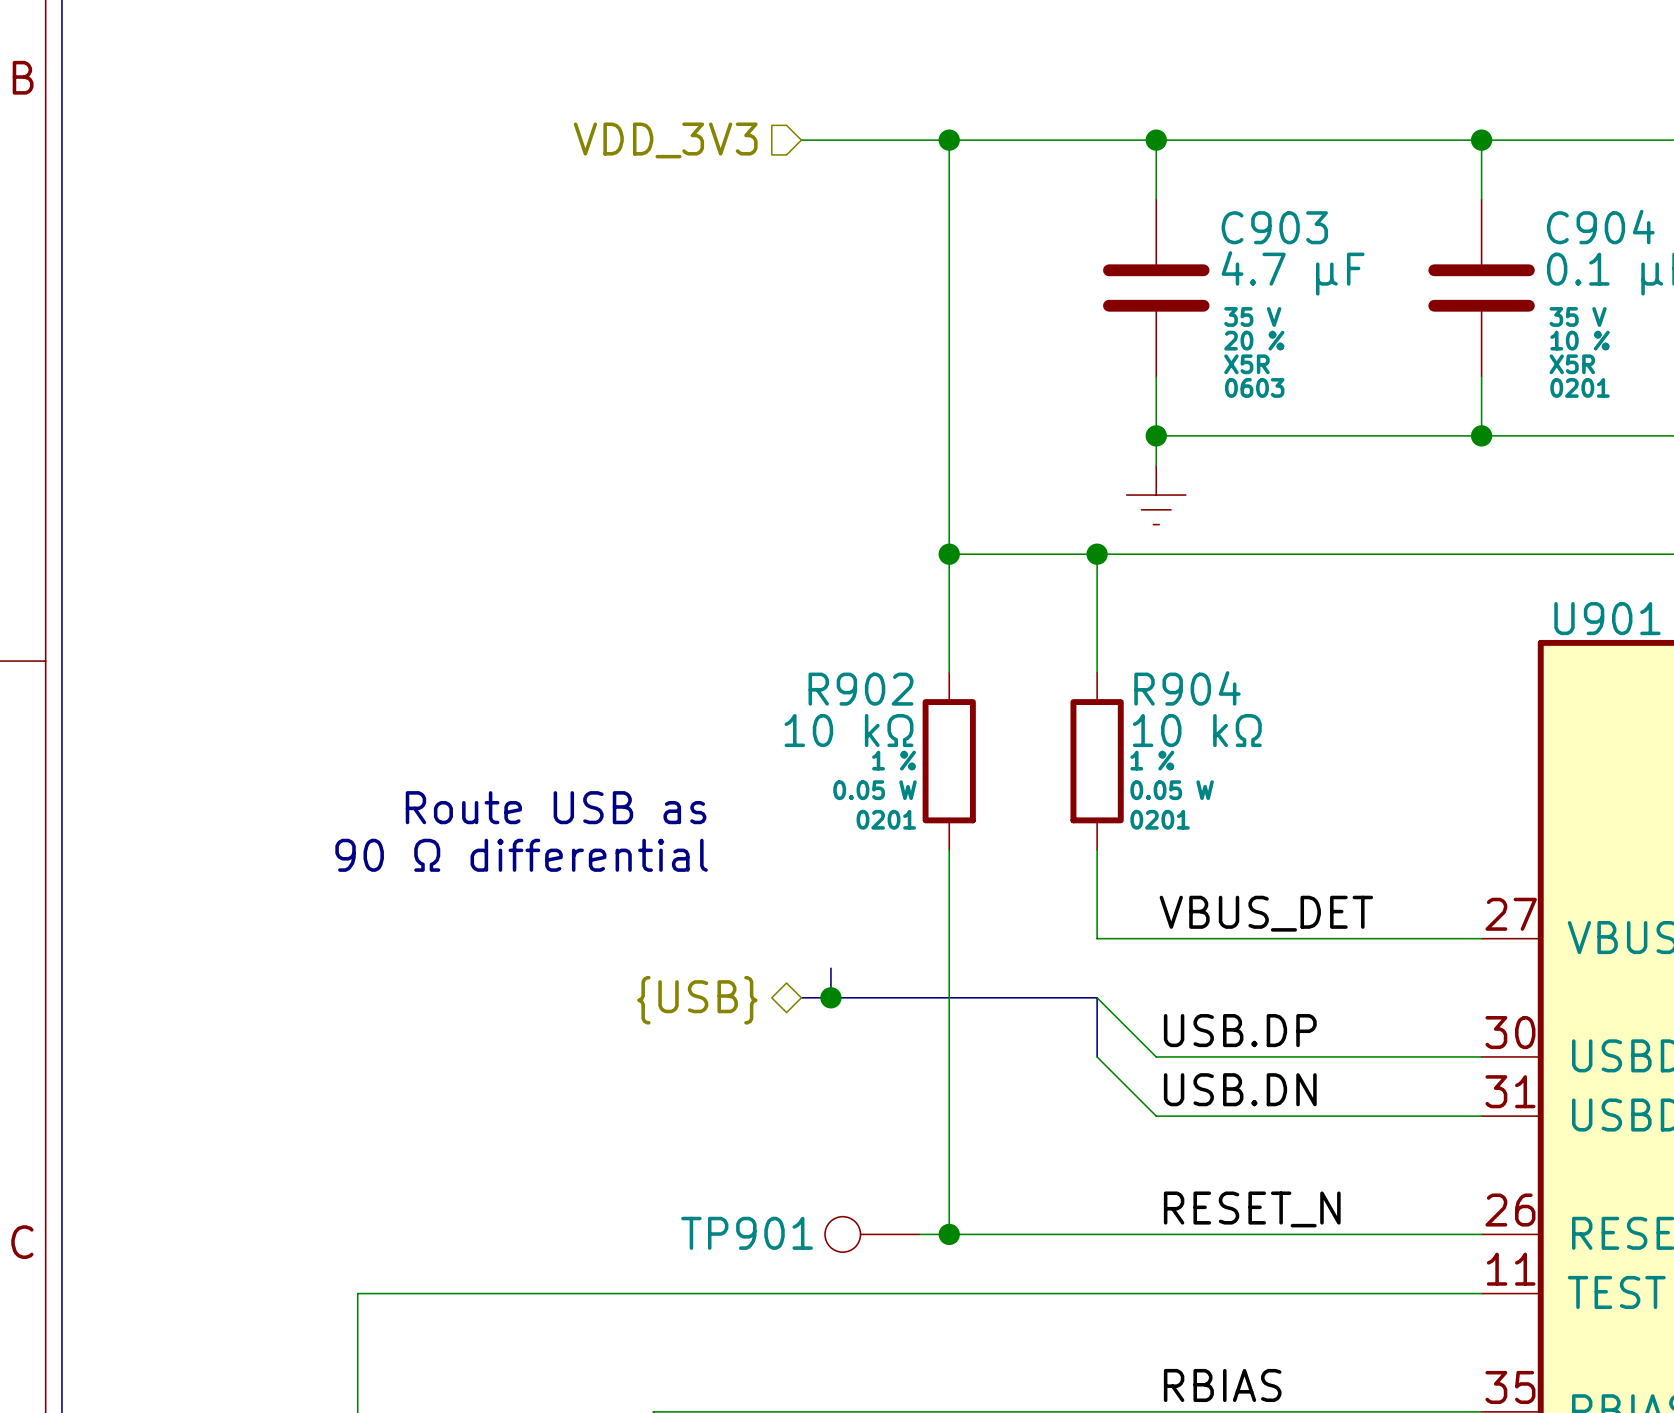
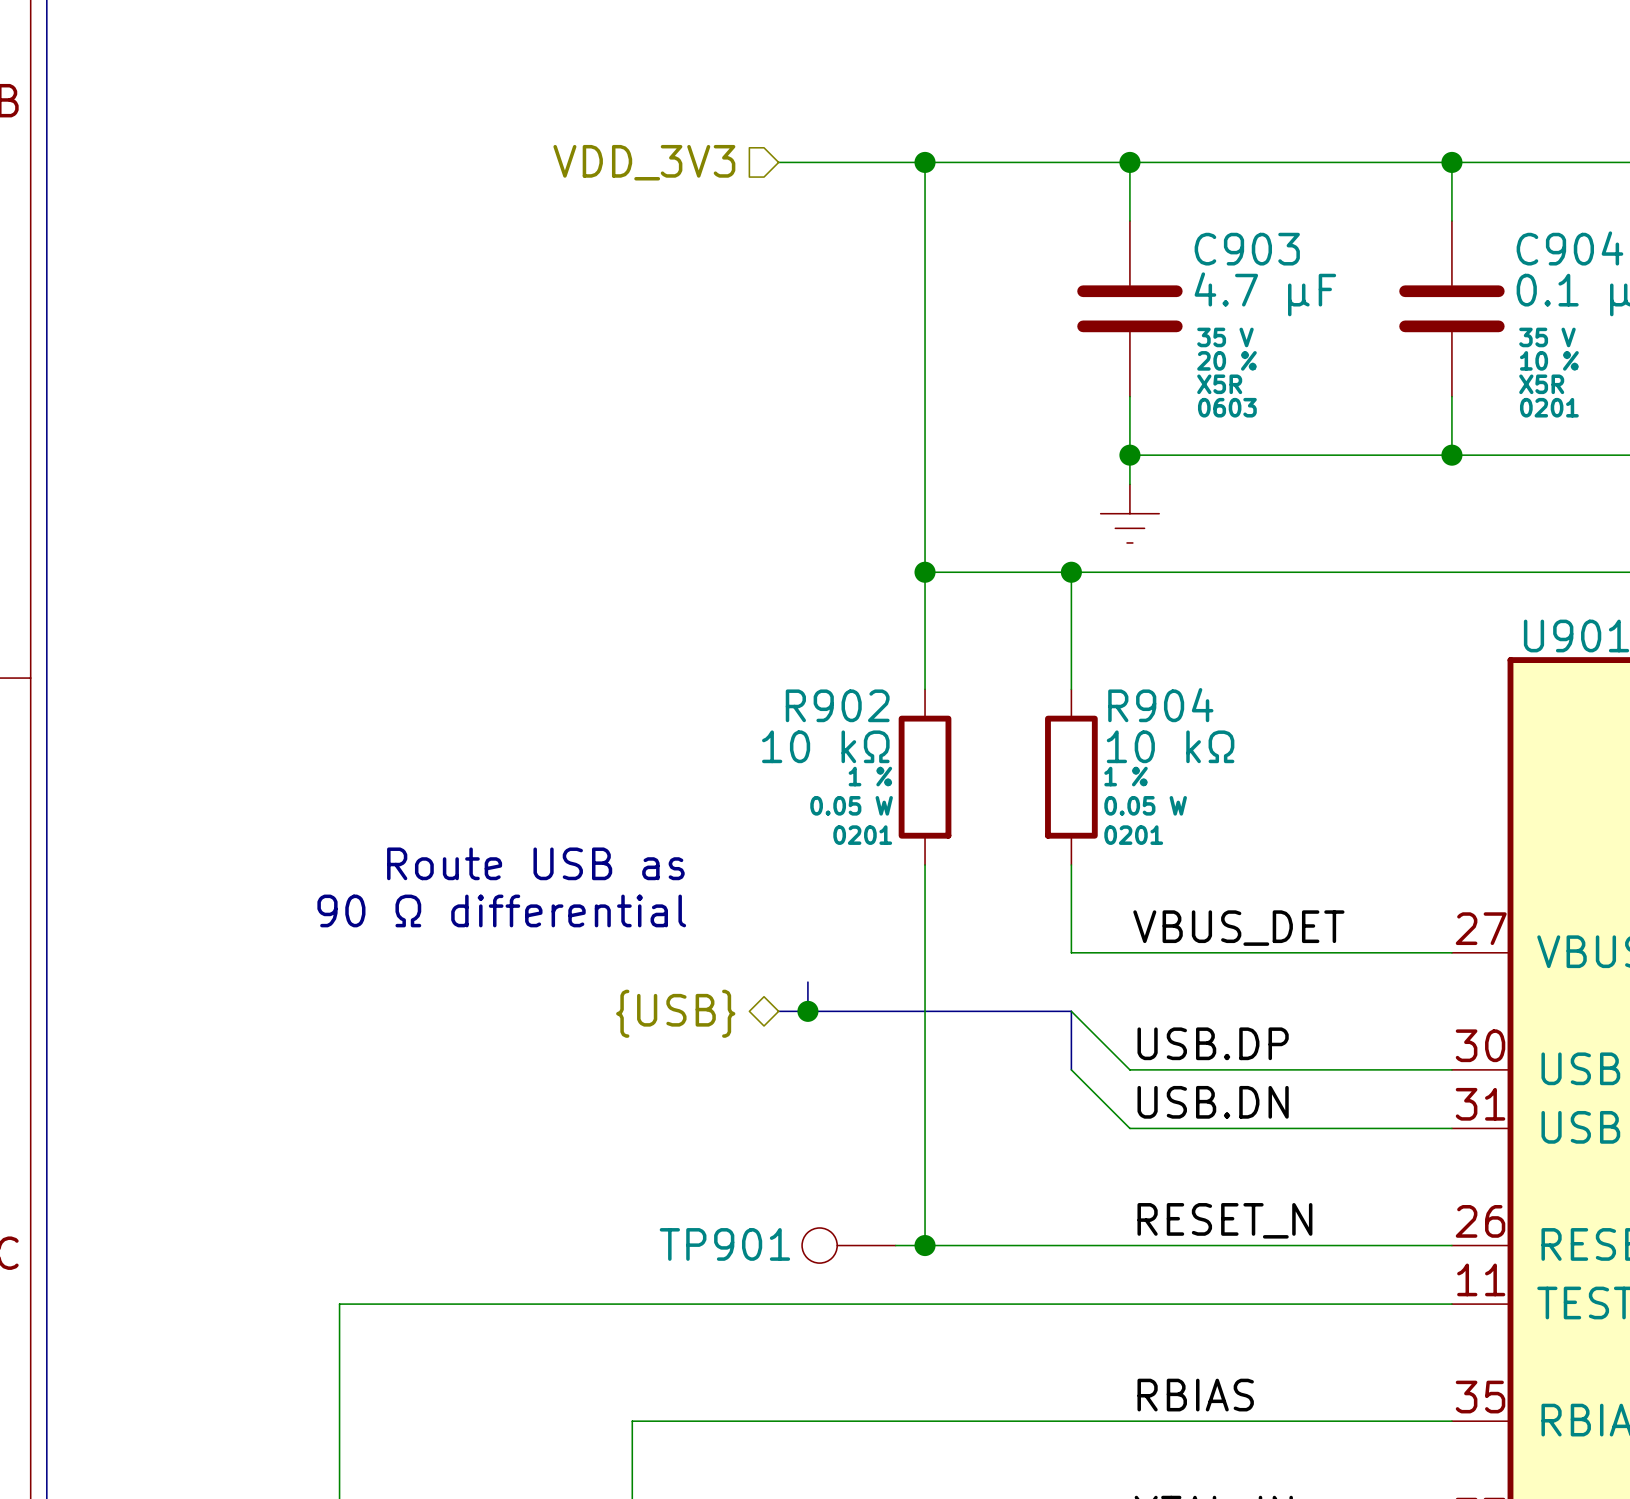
text position: Route USB as (556, 807) -> Route USB as (535, 863)
text position: 90 Ω differential (521, 855) -> 90 Ω differential (501, 910)

